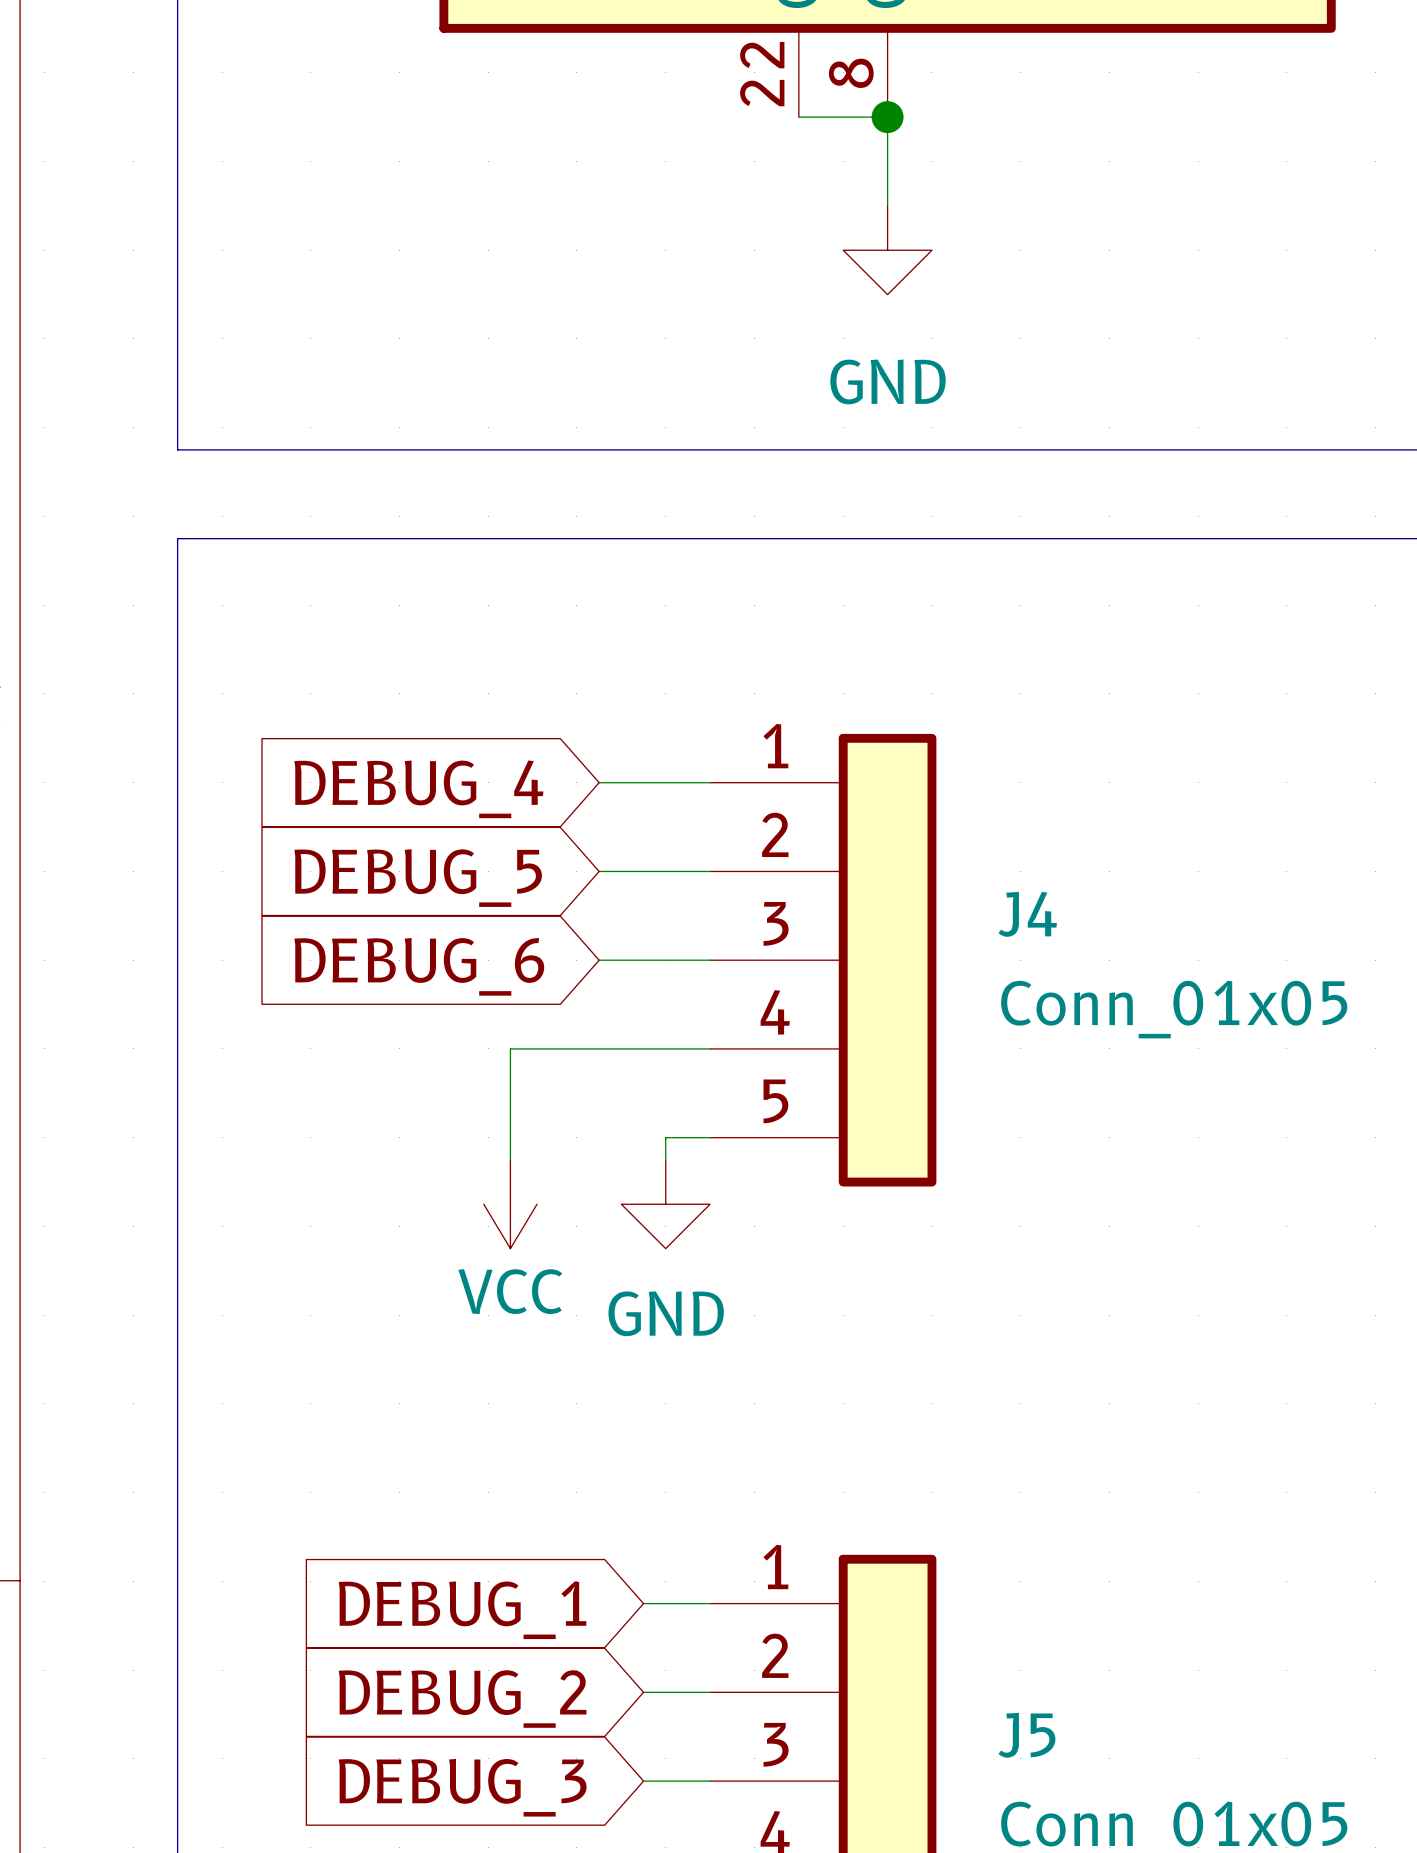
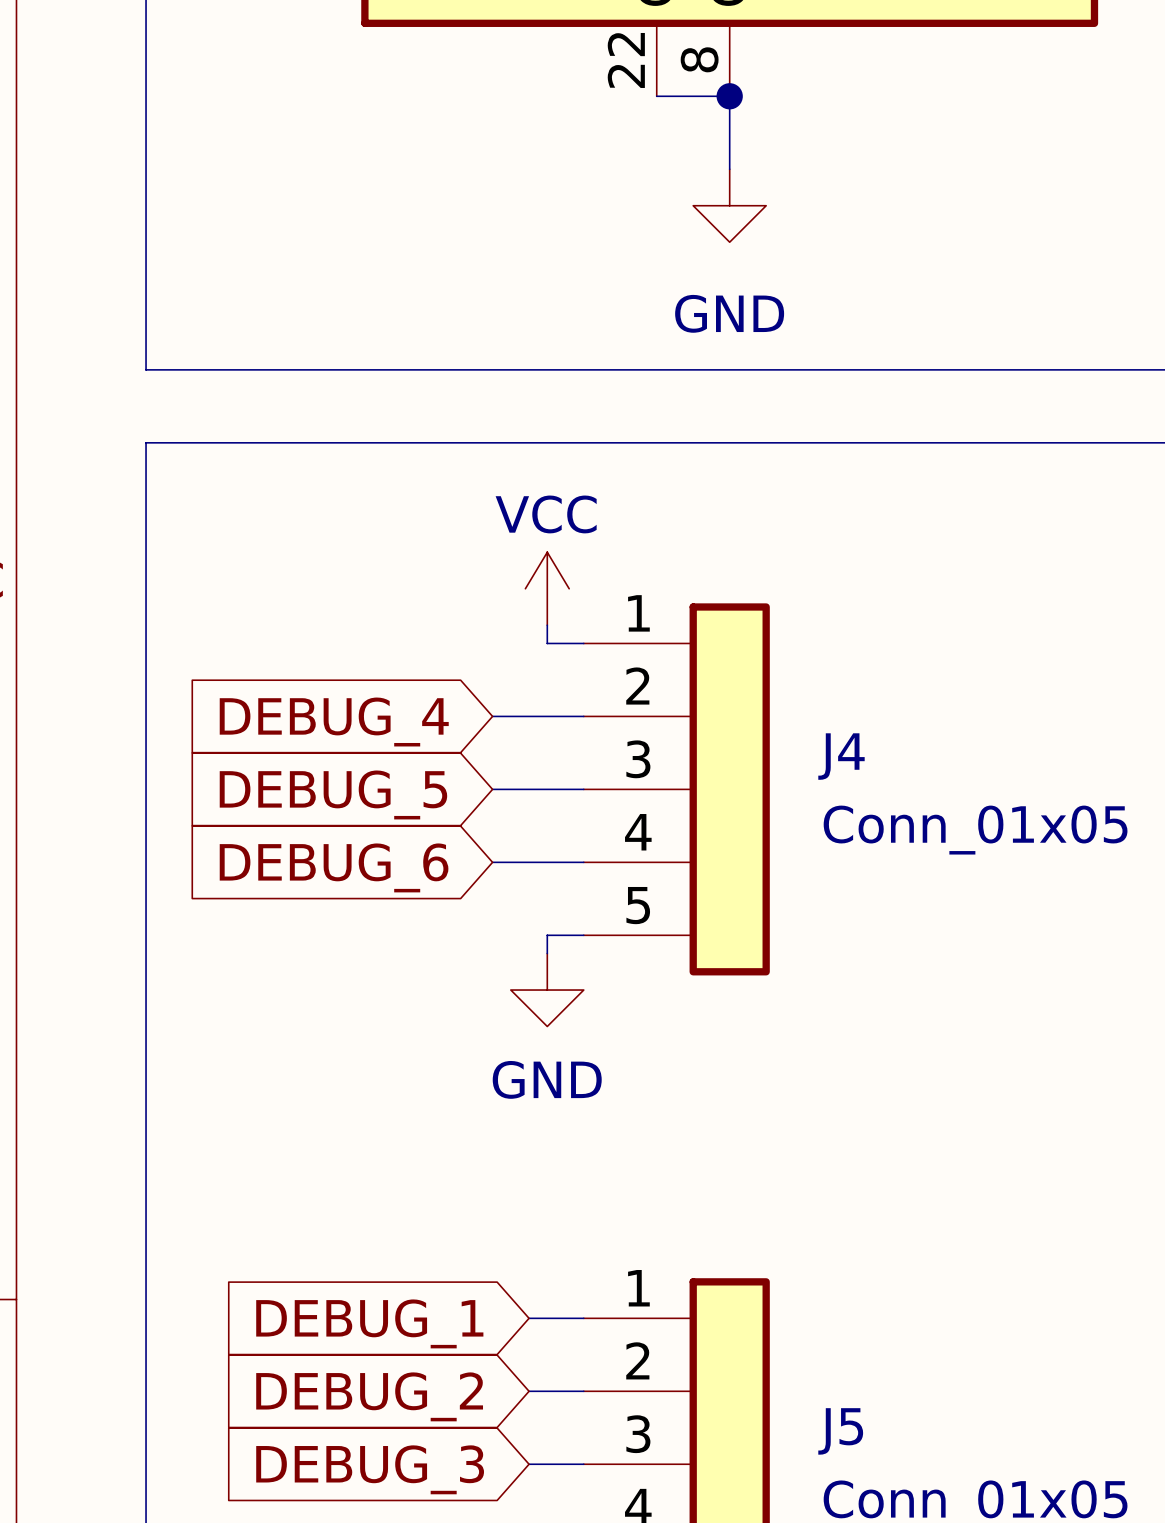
wire: (599, 782) (665, 782) -> (547, 625) (547, 643)
global label: DEBUG_4 (418, 789) -> none
global label: DEBUG_5 (418, 878) -> DEBUG_4 (334, 722)
global label: DEBUG_6 (419, 966) -> DEBUG_5 (333, 794)
wire: (599, 1048) (510, 1048) (510, 1159) -> none
global label: none -> DEBUG_6 (334, 867)
power symbol rotation: 0° (510, 1204) -> 180° (547, 588)
power symbol position: VCC (510, 1204) -> VCC (547, 588)

